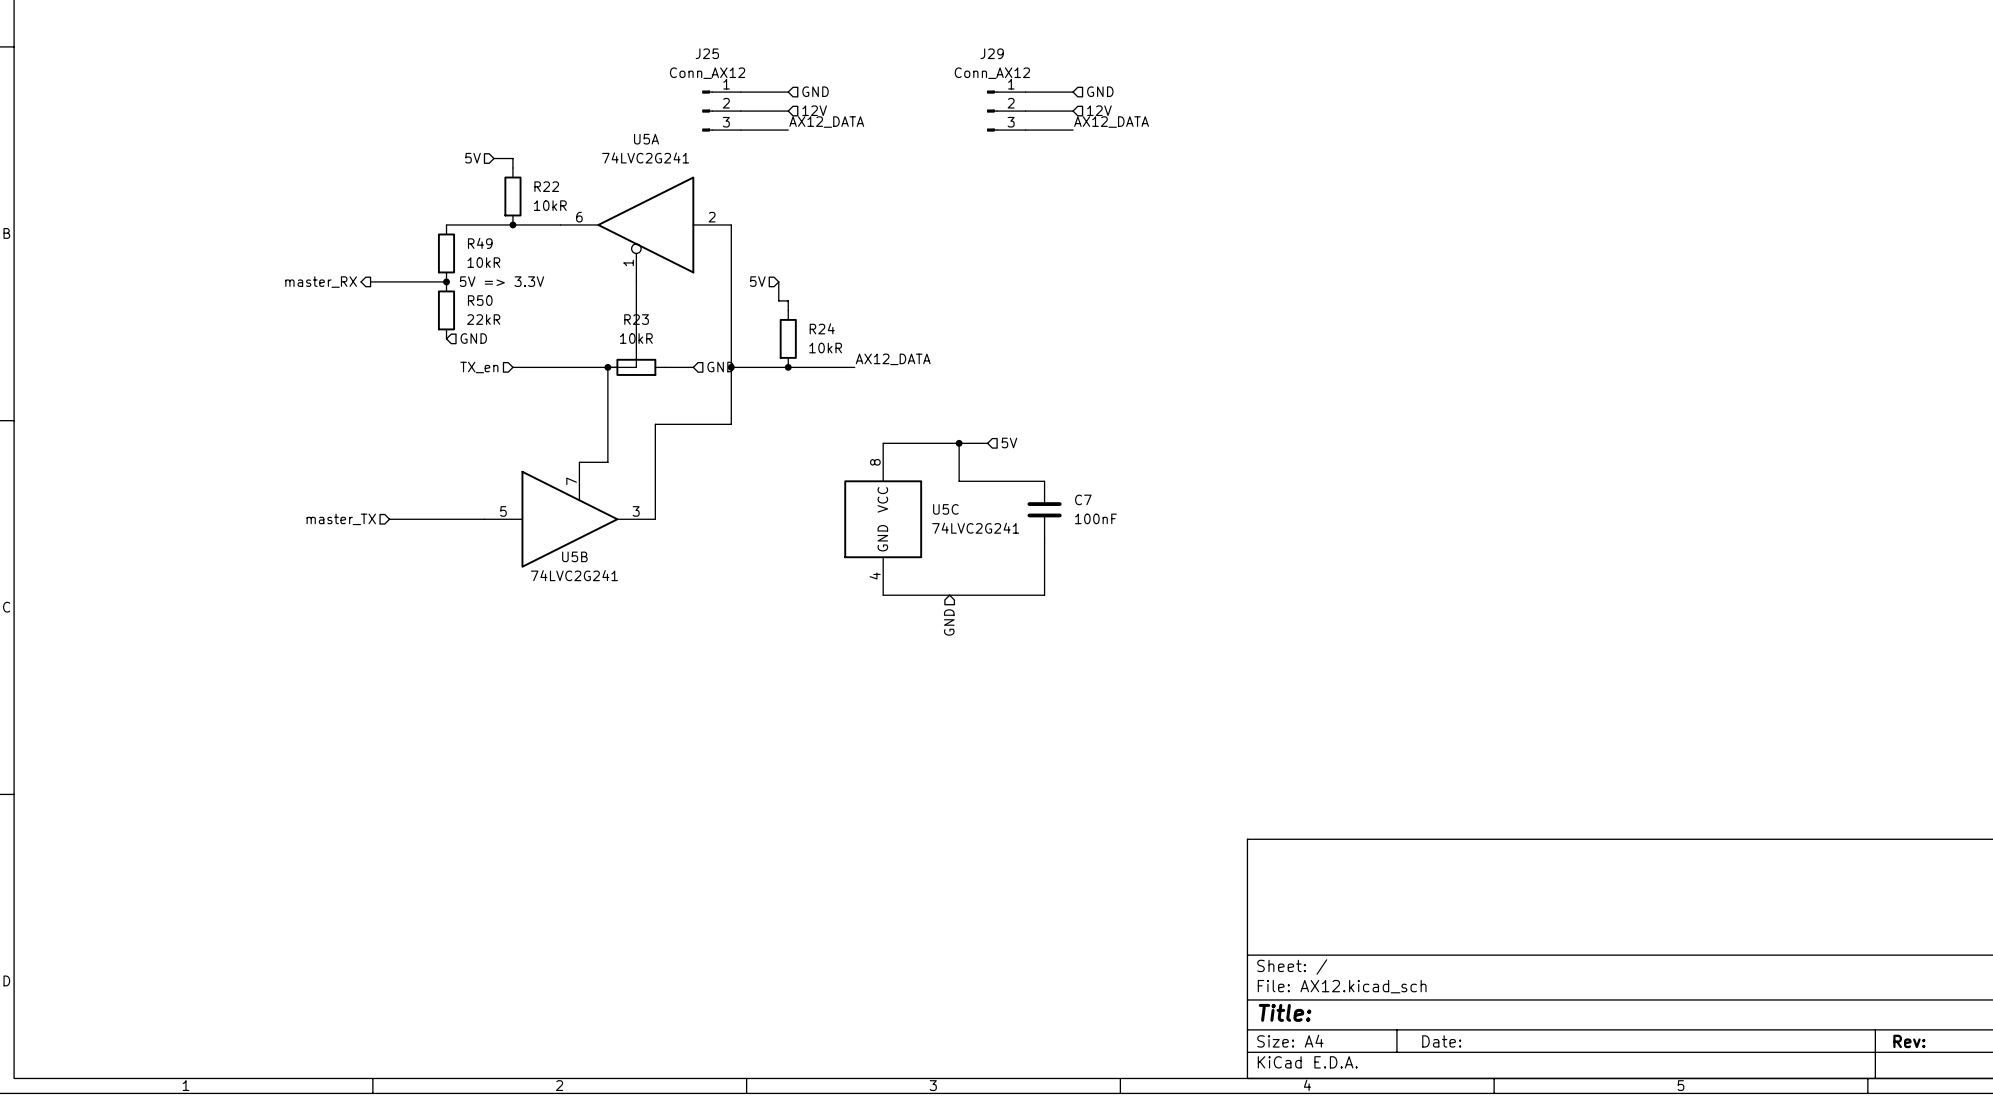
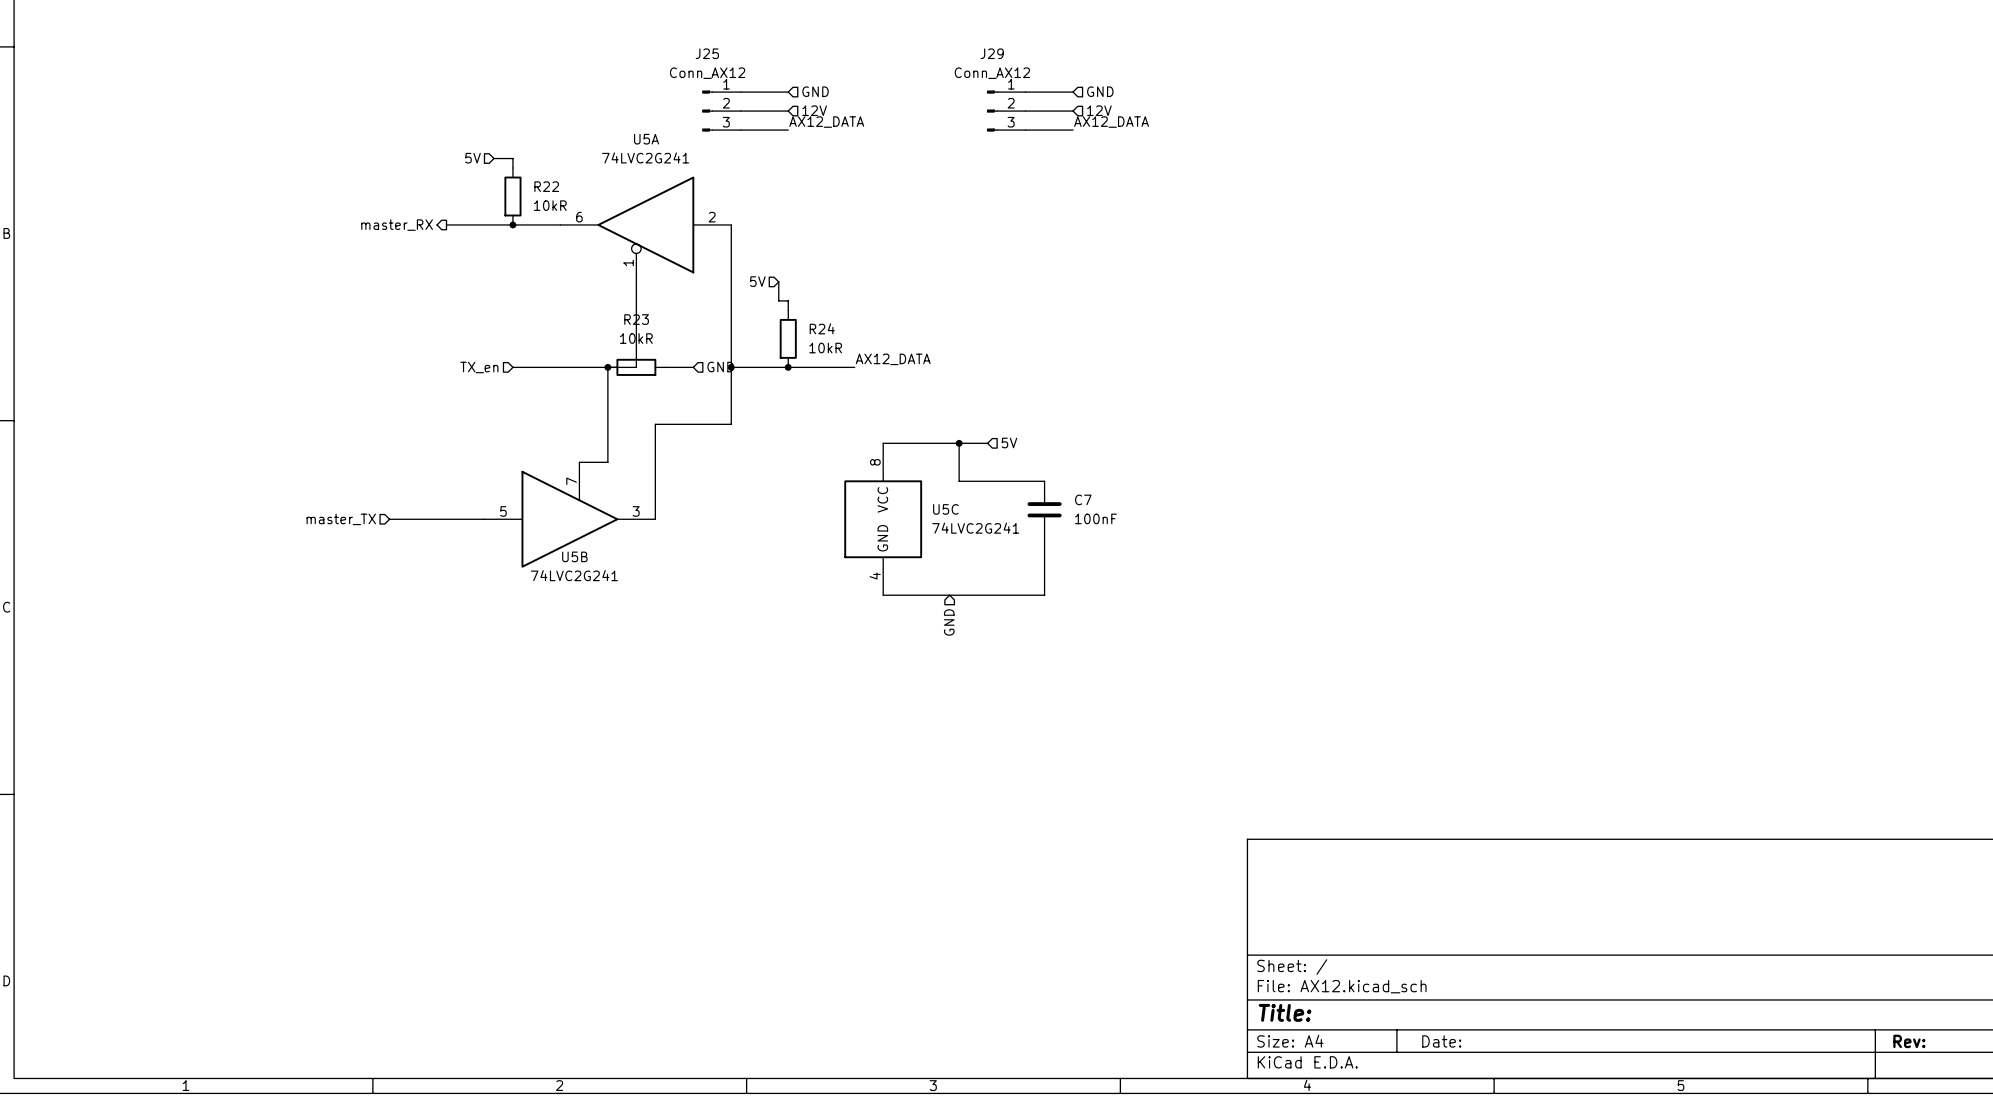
R49: 10kR (446, 253) -> none
wire: (370, 281) (446, 281) -> none
junction: (446, 281) -> none
text: 5V => 3.3V (502, 281) -> none
hierarchical label position: master_RX (321, 282) -> master_RX (397, 225)
R50: 22kR (446, 310) -> none
hierarchical label: GND (473, 338) -> none

